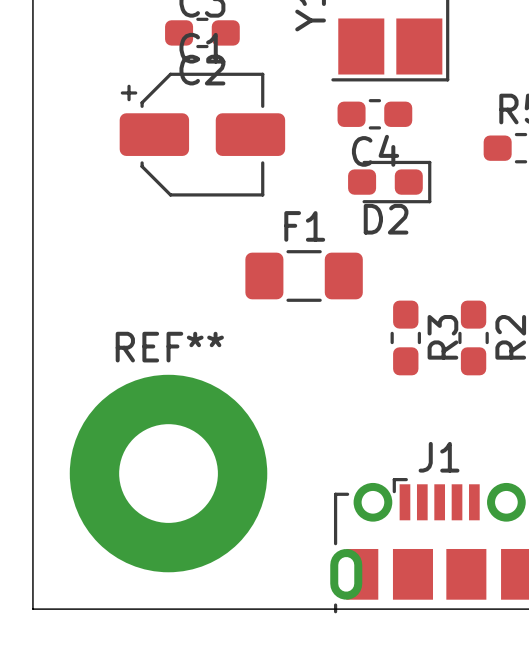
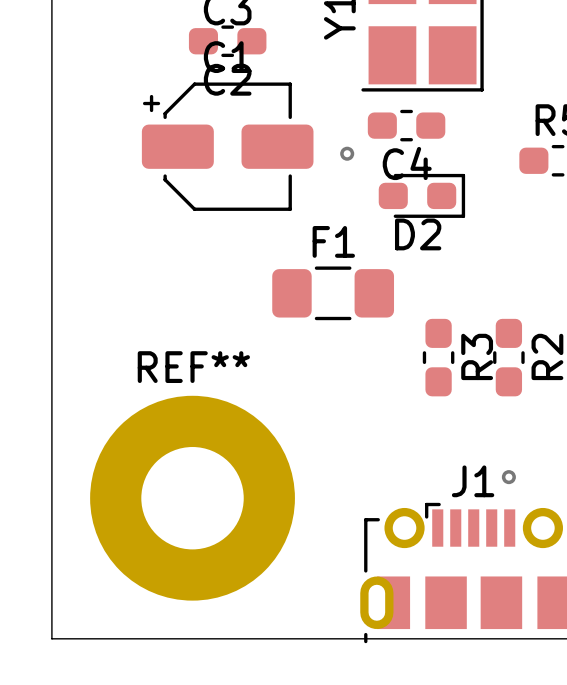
via: none -> (347, 153)
via: none -> (508, 477)

